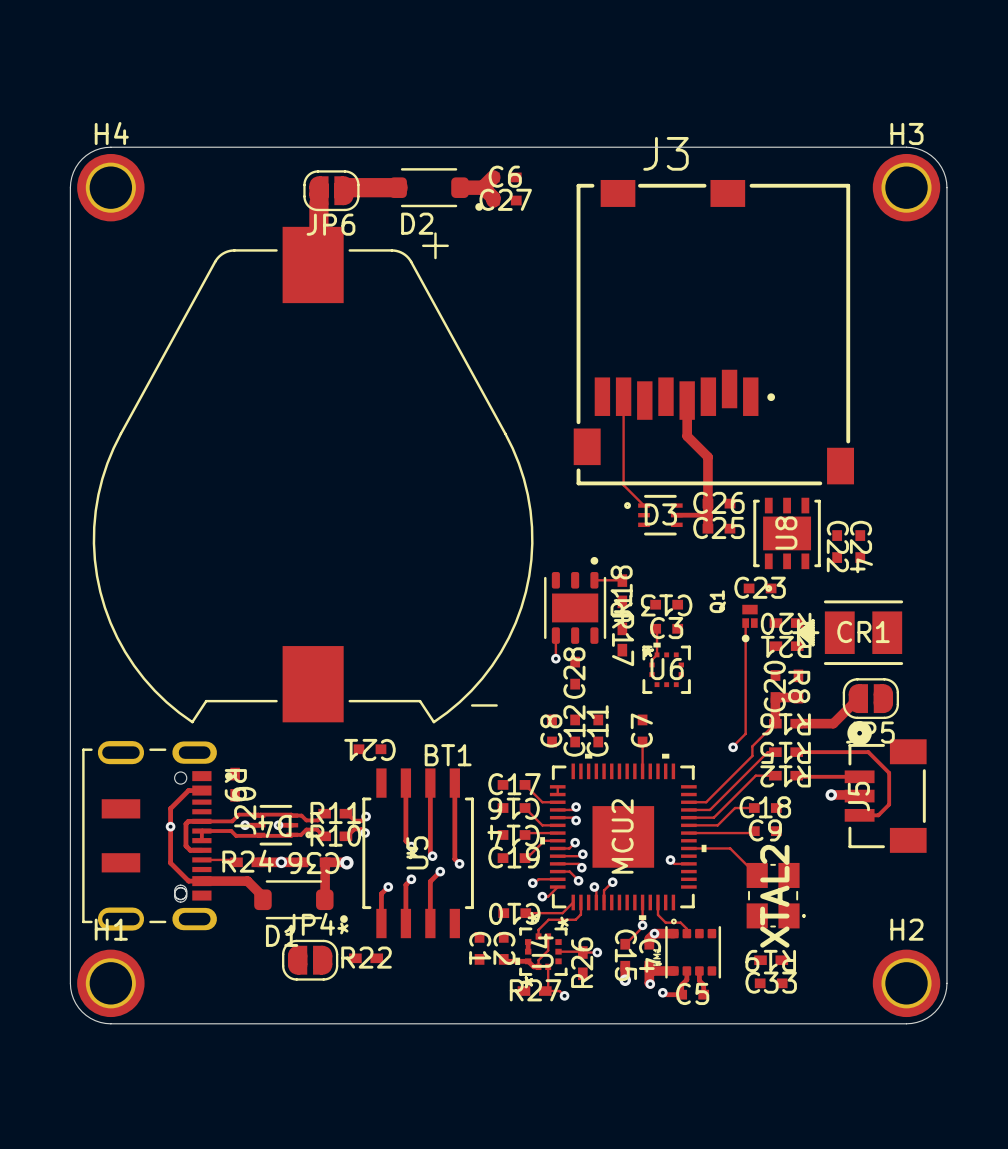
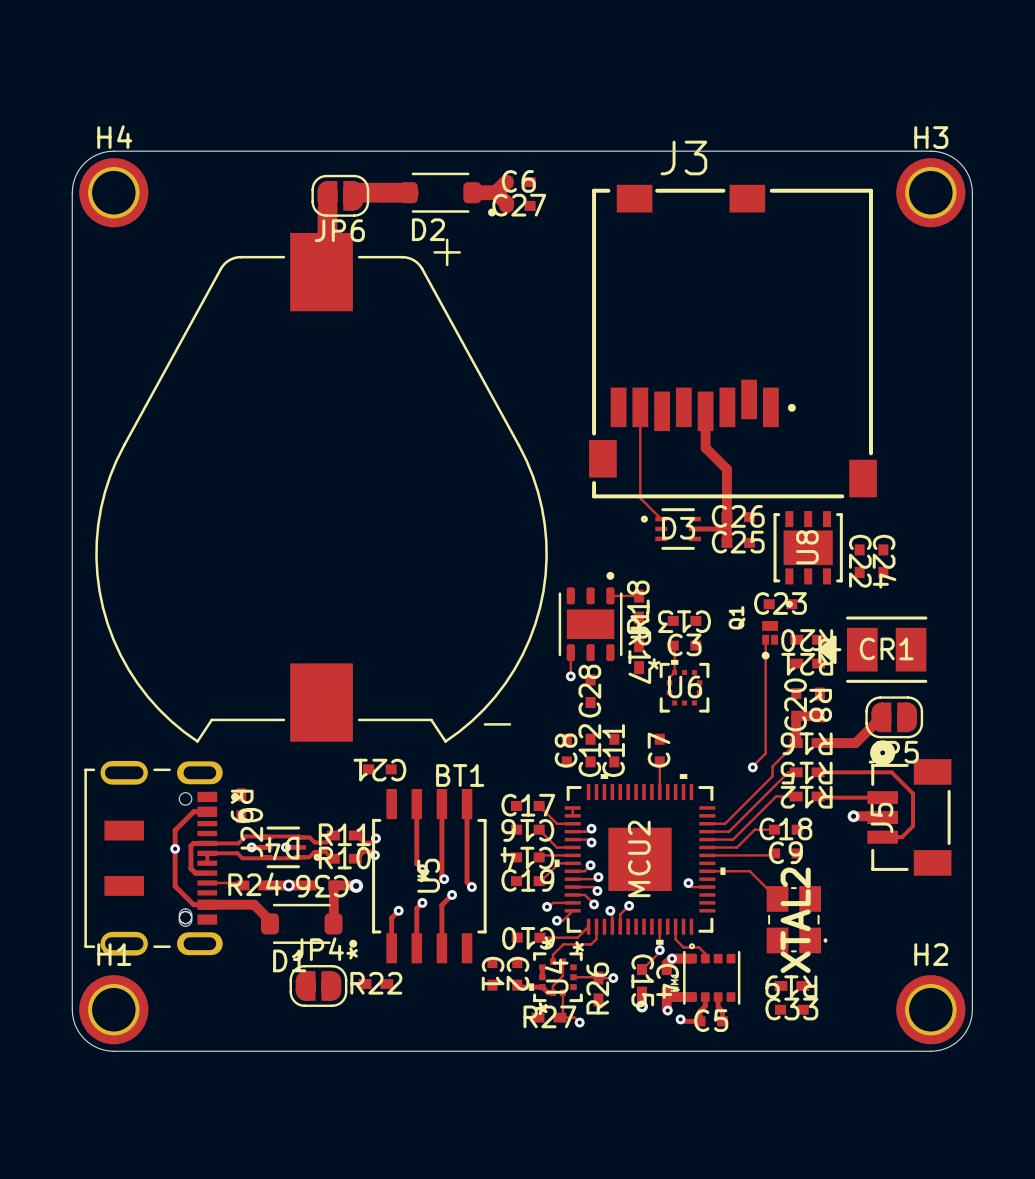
U6 footprint: [642, 642, 691, 694] -> [659, 659, 710, 713]

